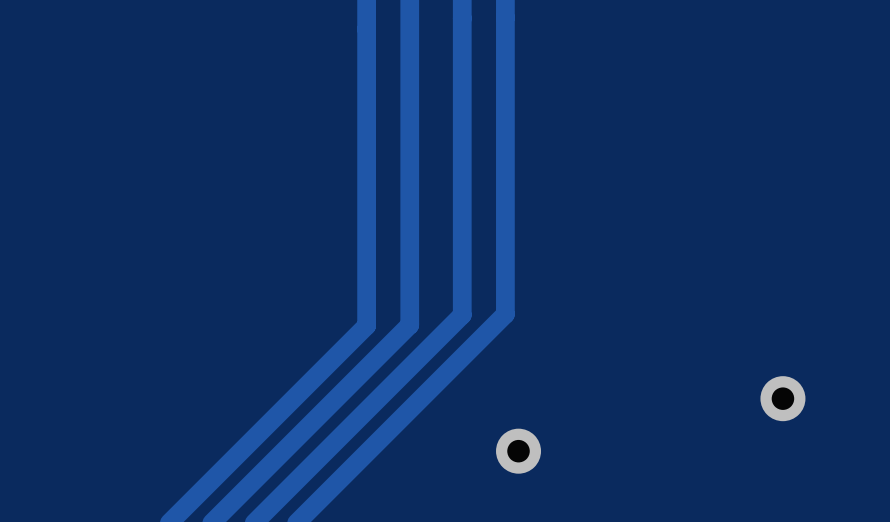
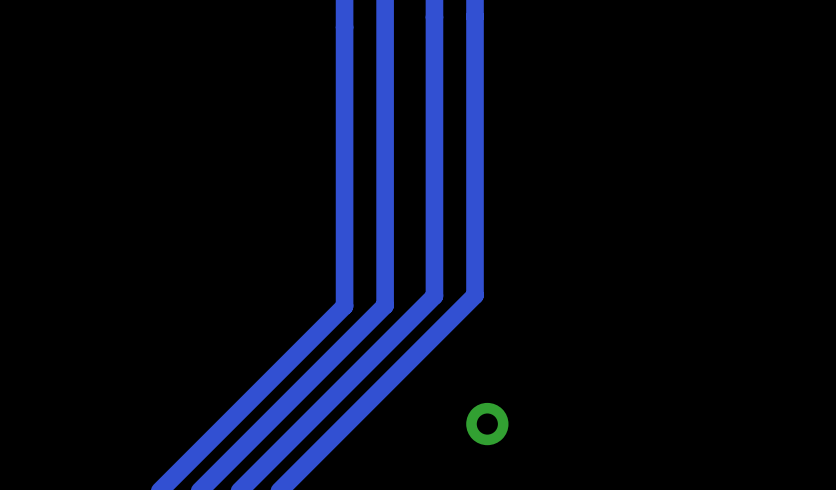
via: (782, 398) -> none

